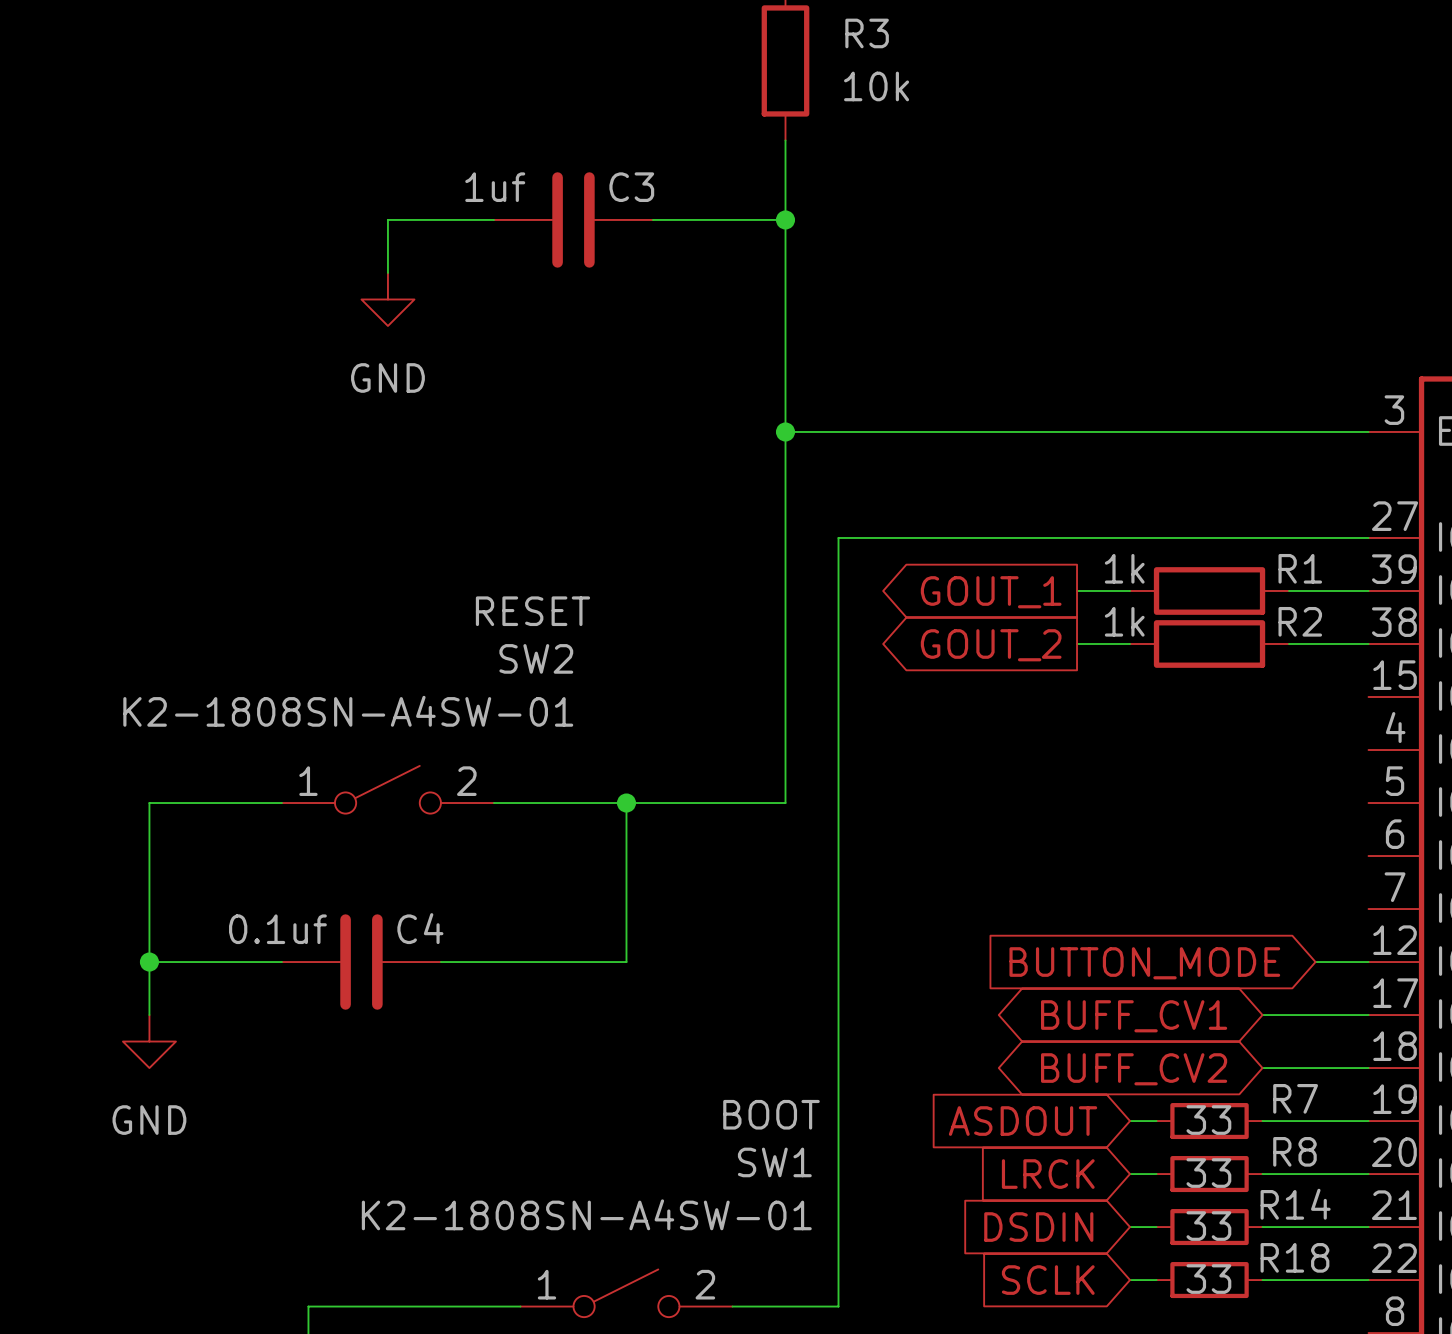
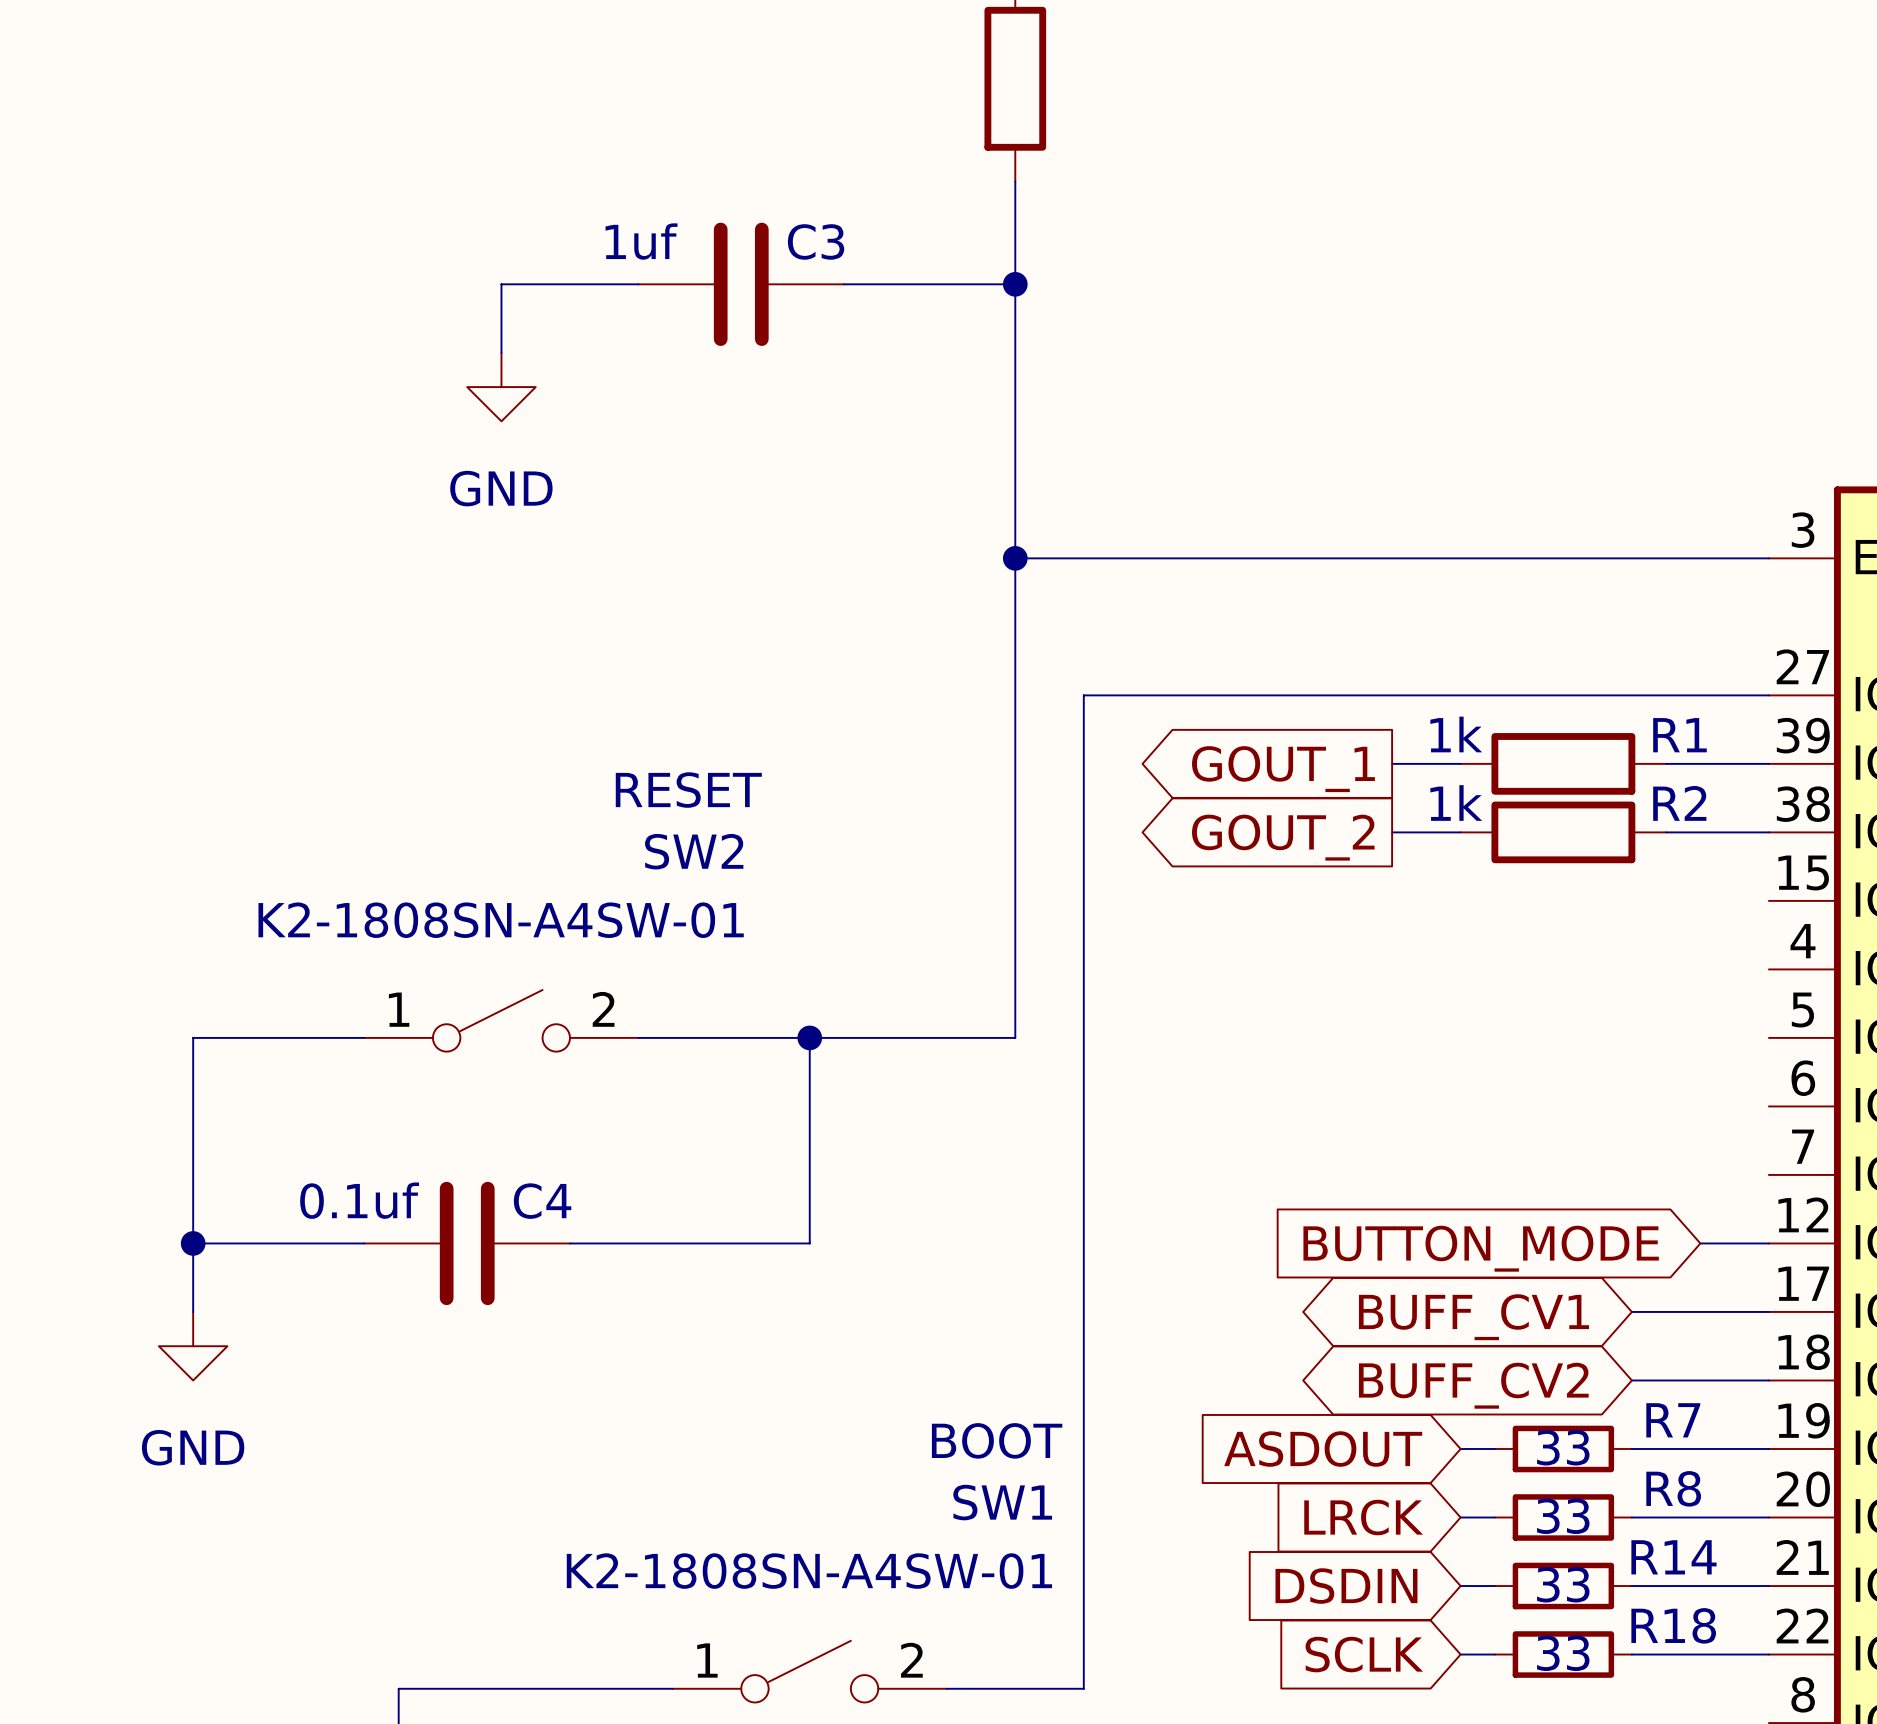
R3 name: R3 (867, 33) -> none
R3 value: 10k (876, 86) -> none

